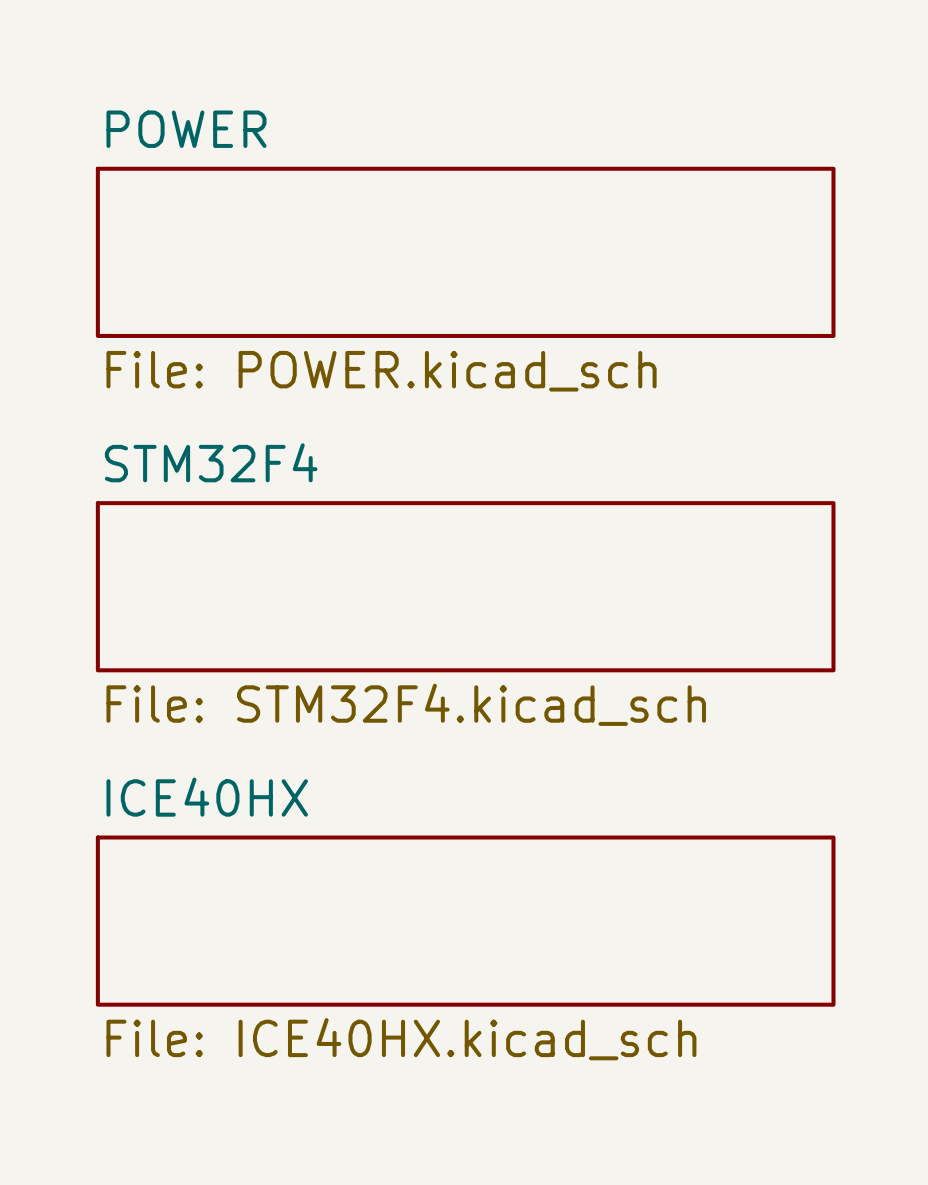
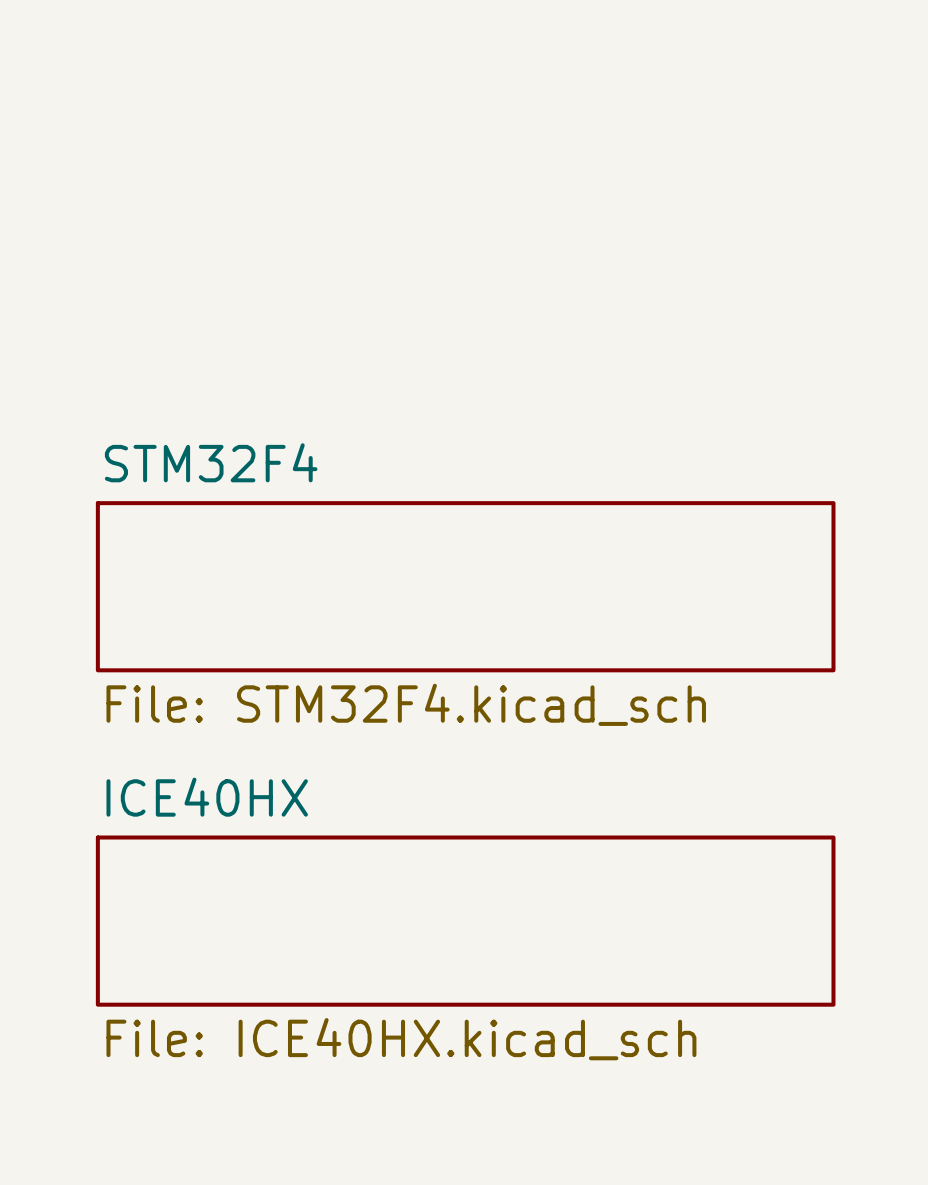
sheet POWER: File: POWER.kicad_sch (465, 252) -> none

